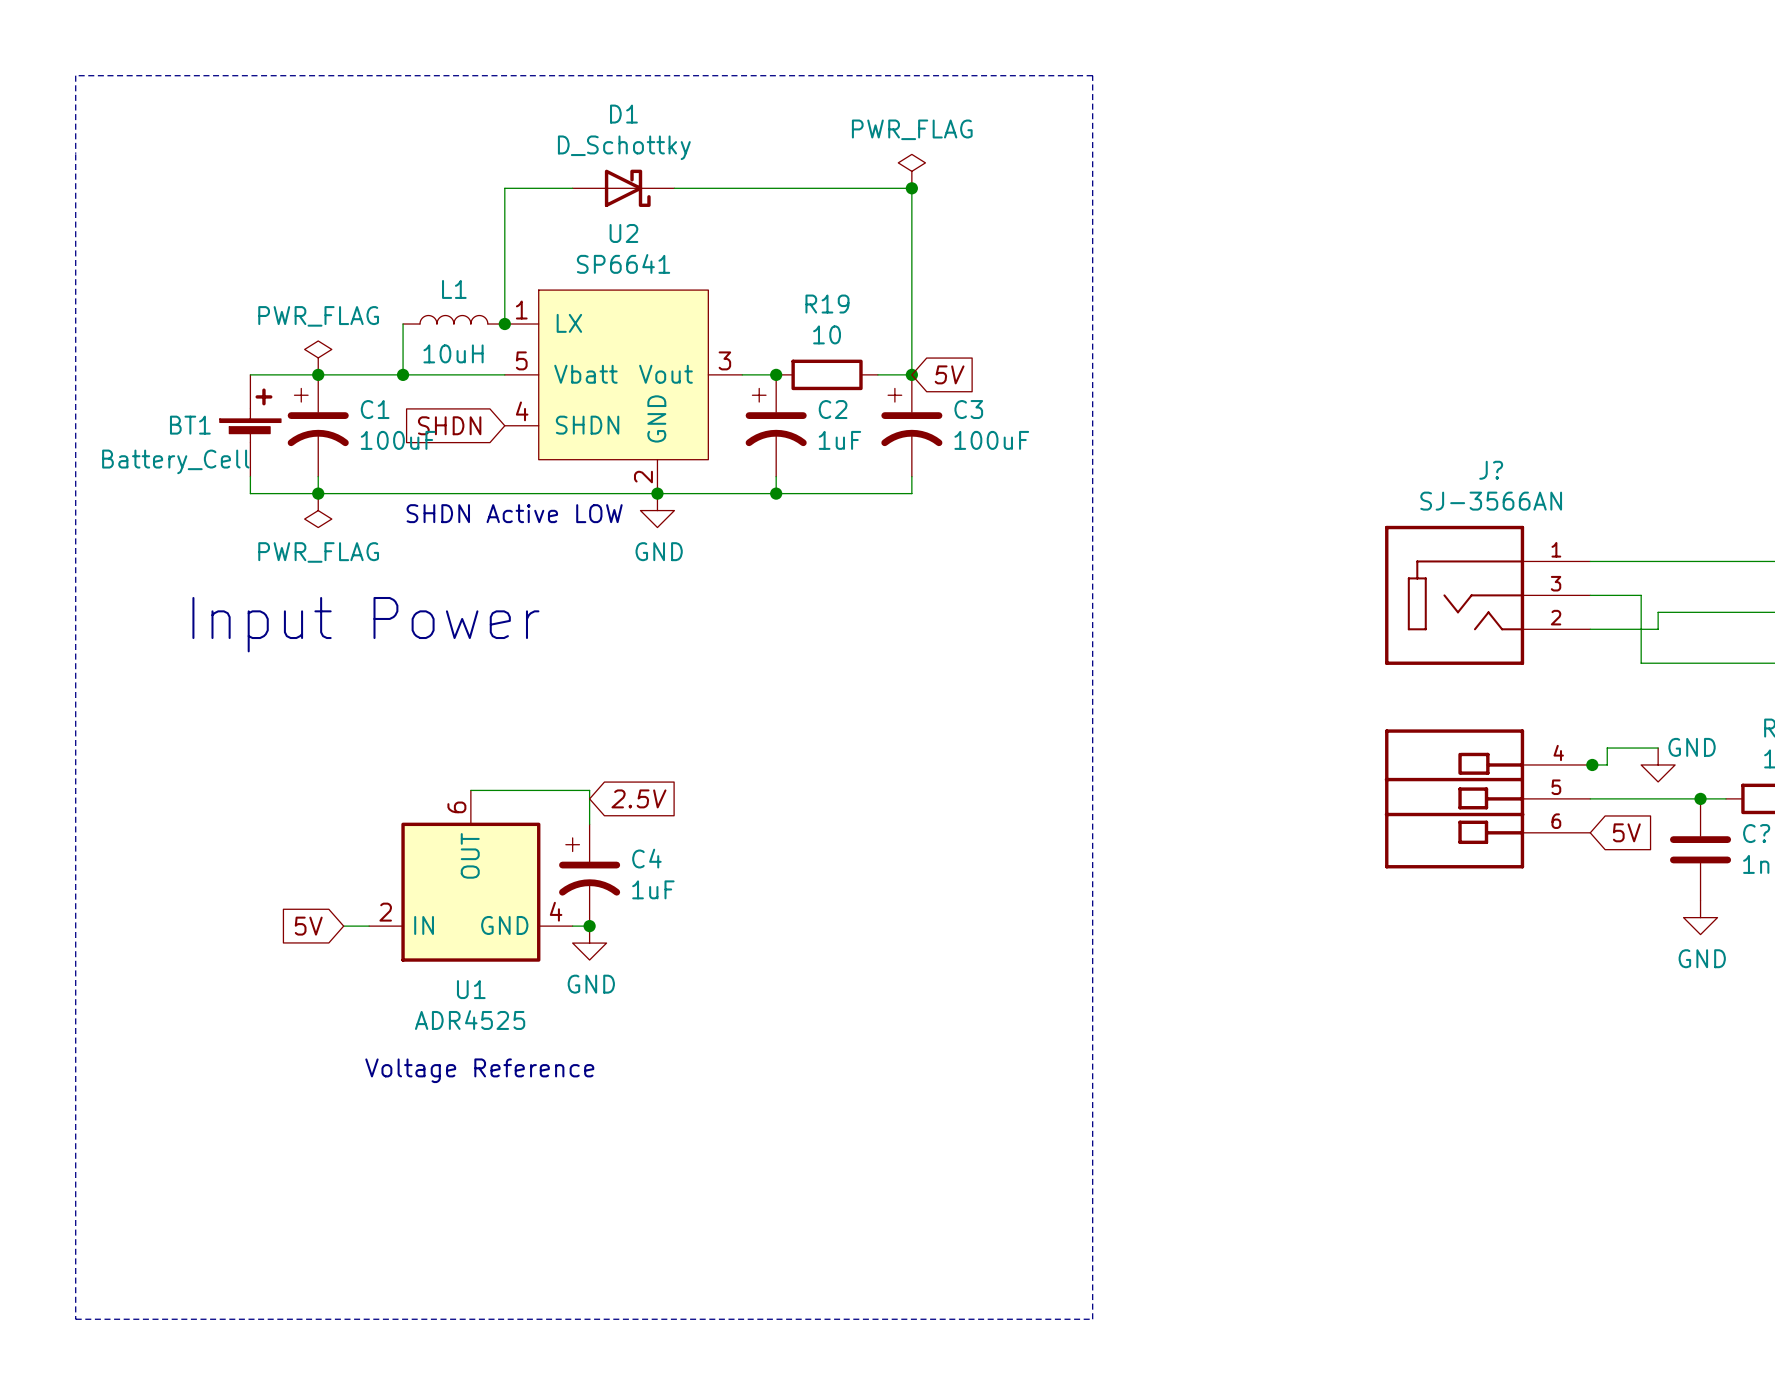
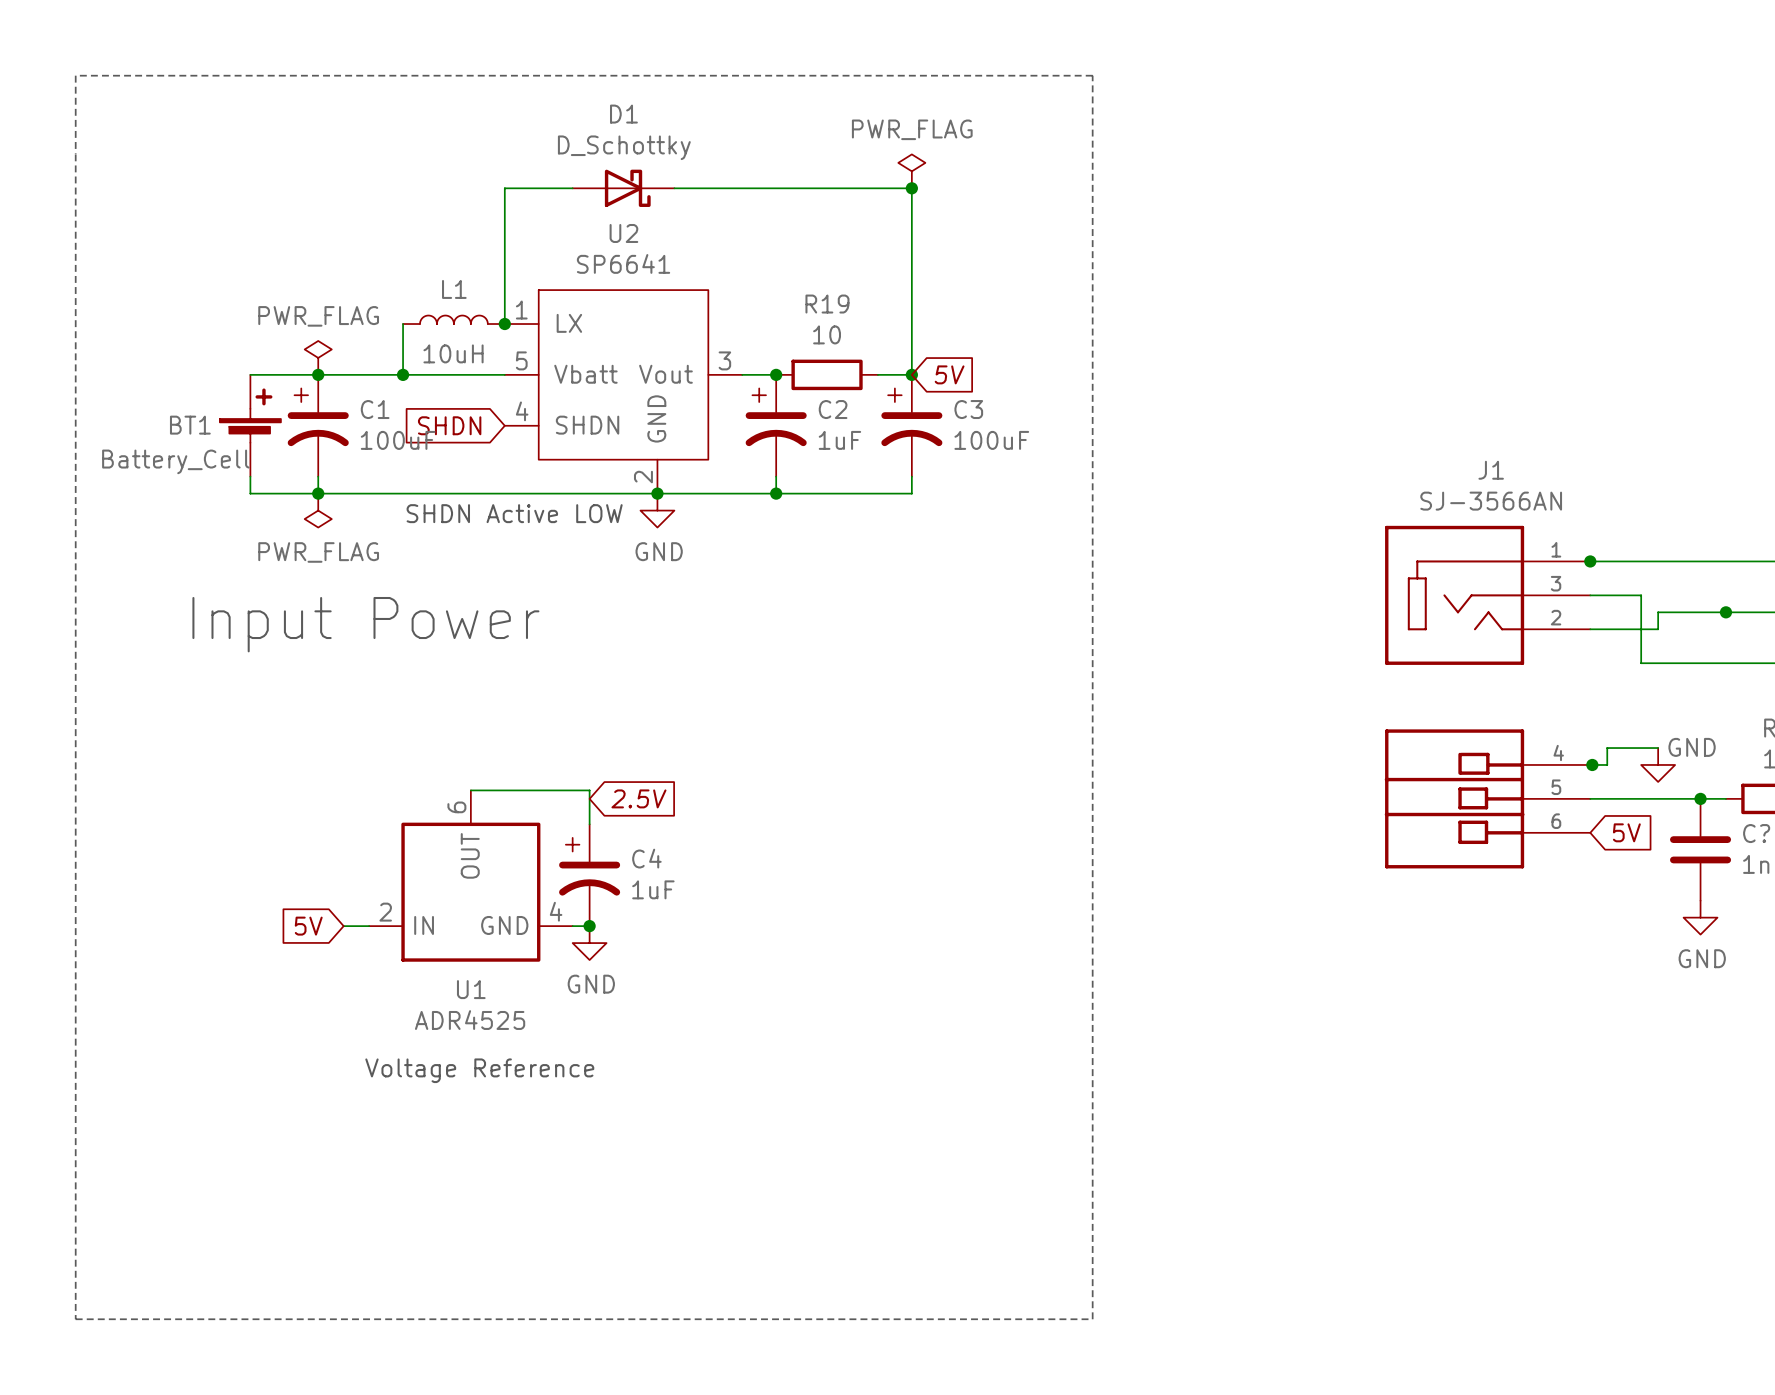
J? name: J? (1491, 470) -> J1 (1491, 470)
junction: none -> (1590, 561)
junction: none -> (1725, 612)

